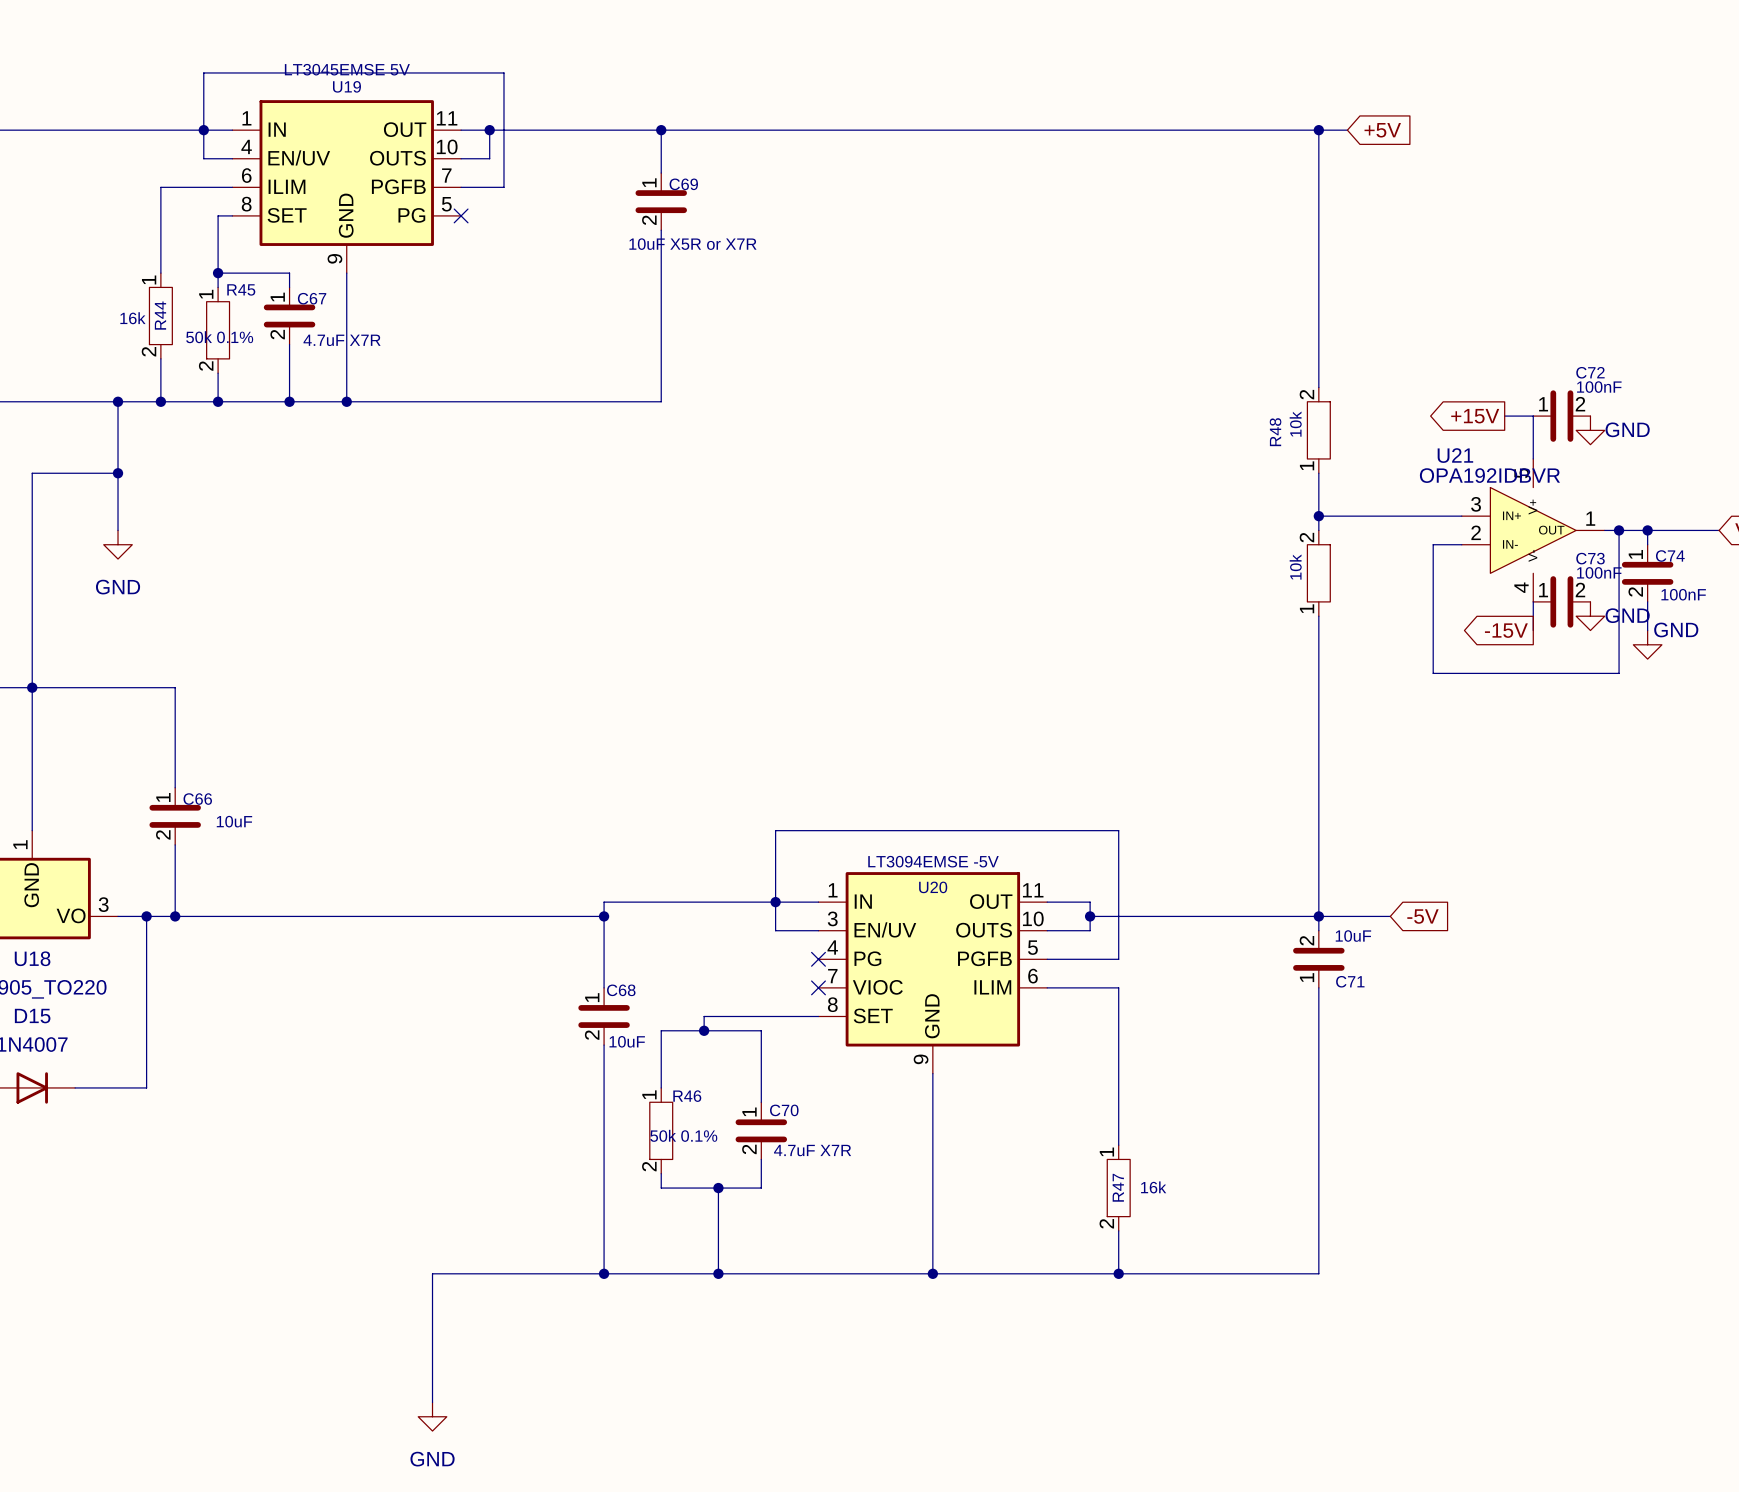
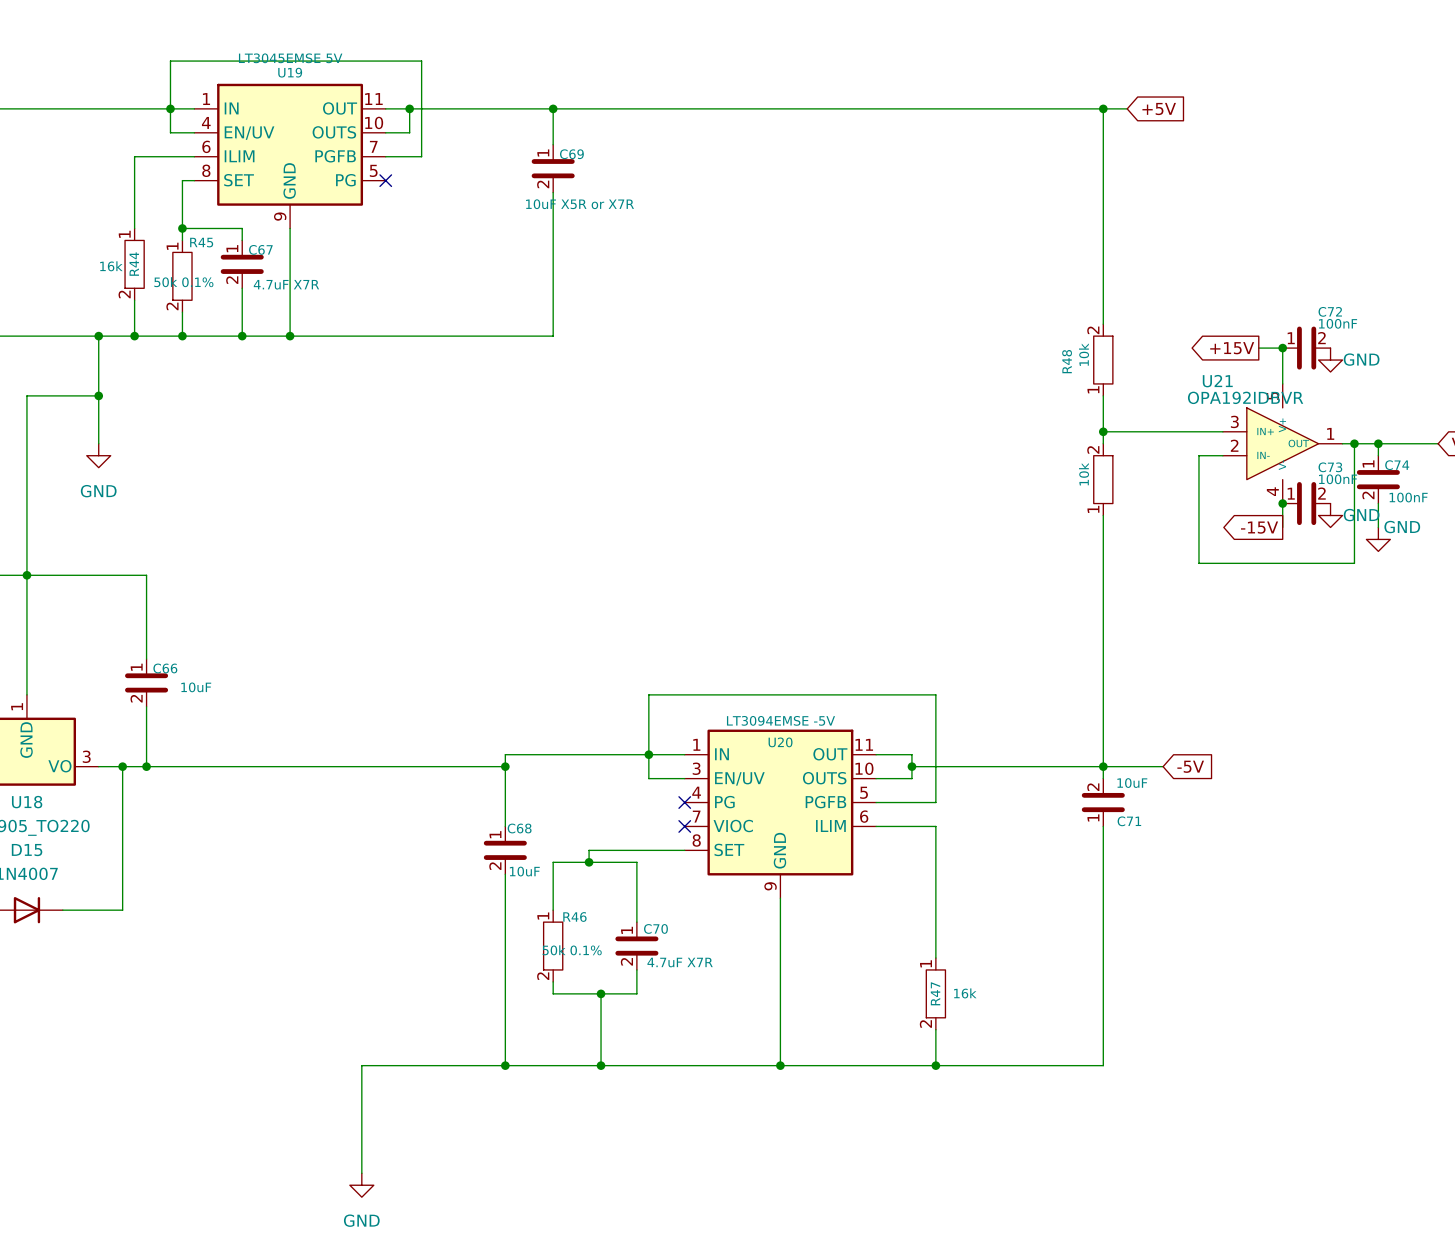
junction: none -> (1282, 348)
junction: none -> (1282, 503)

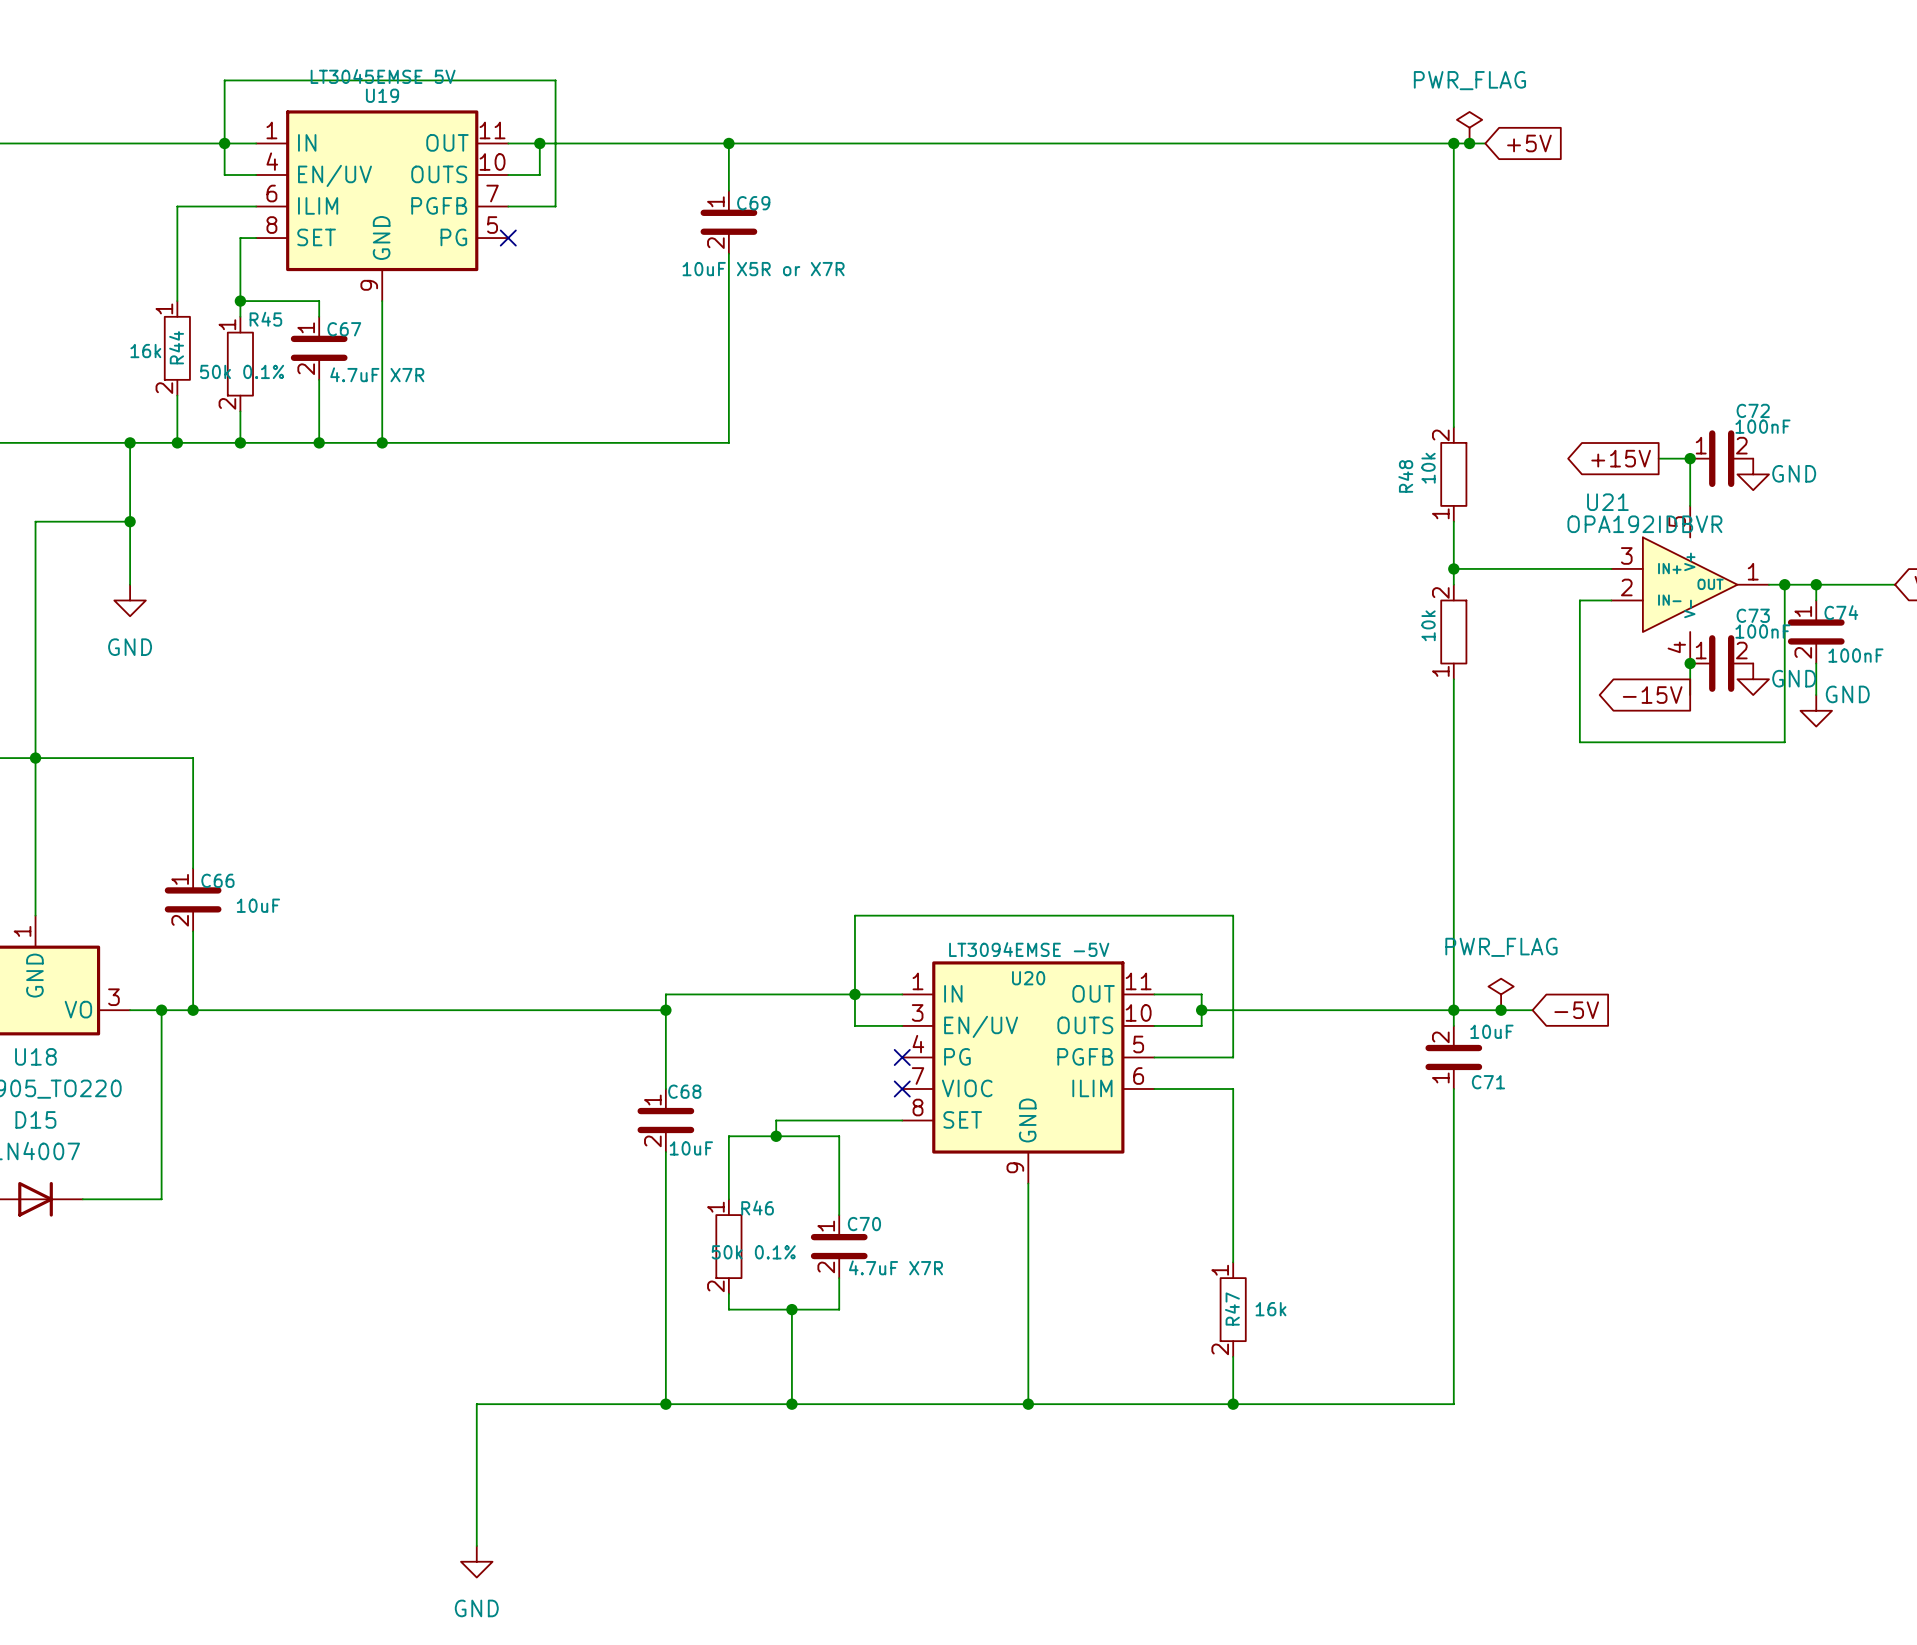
power symbol: none -> PWR_FLAG (1469, 127)
junction: none -> (1469, 143)
power symbol: none -> PWR_FLAG (1501, 994)
junction: none -> (1501, 1010)

